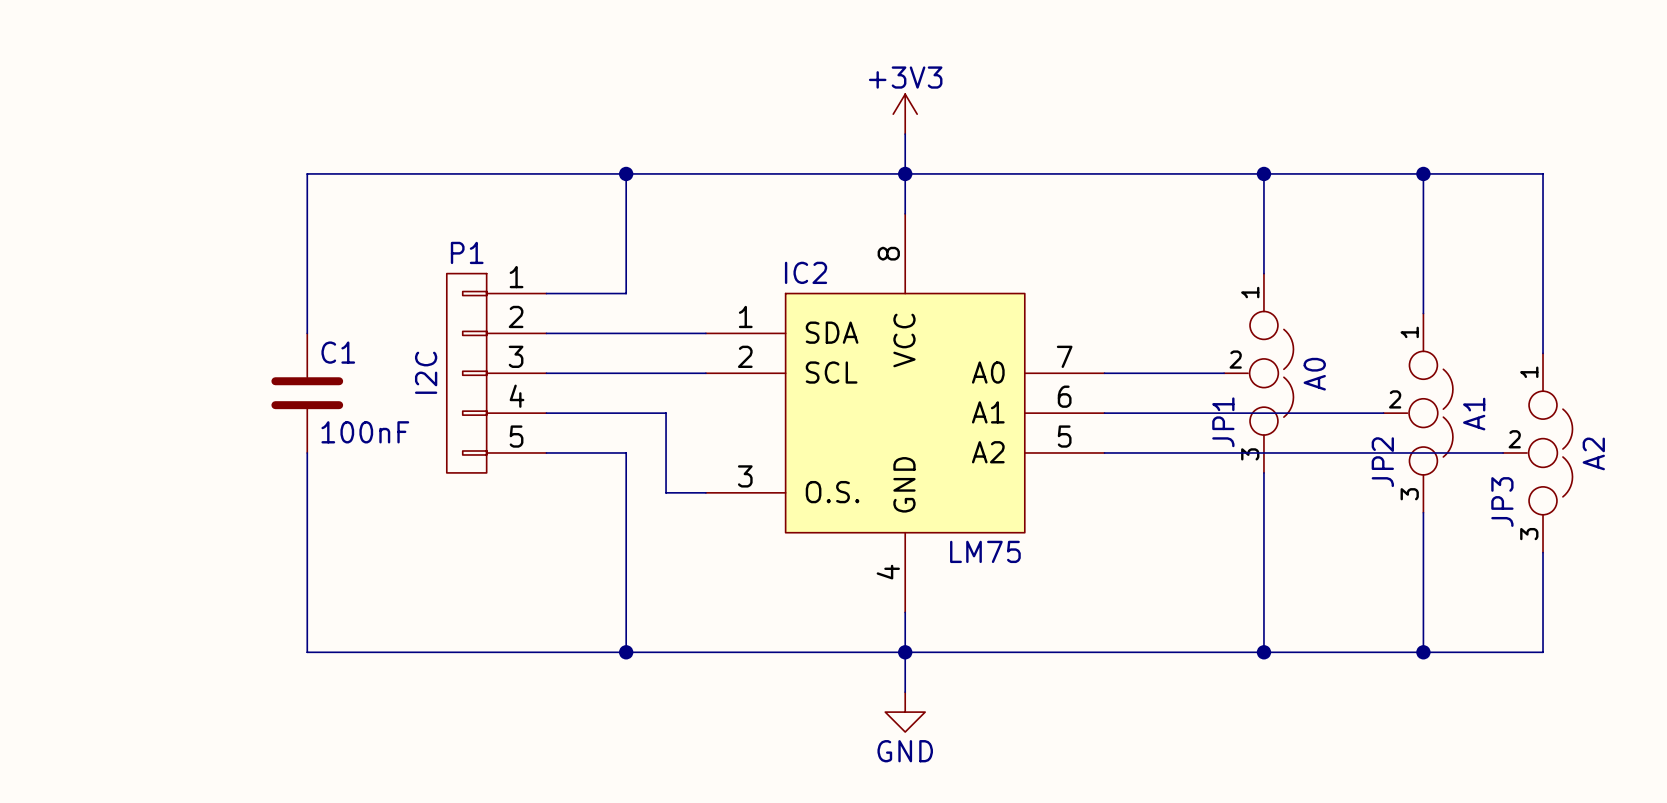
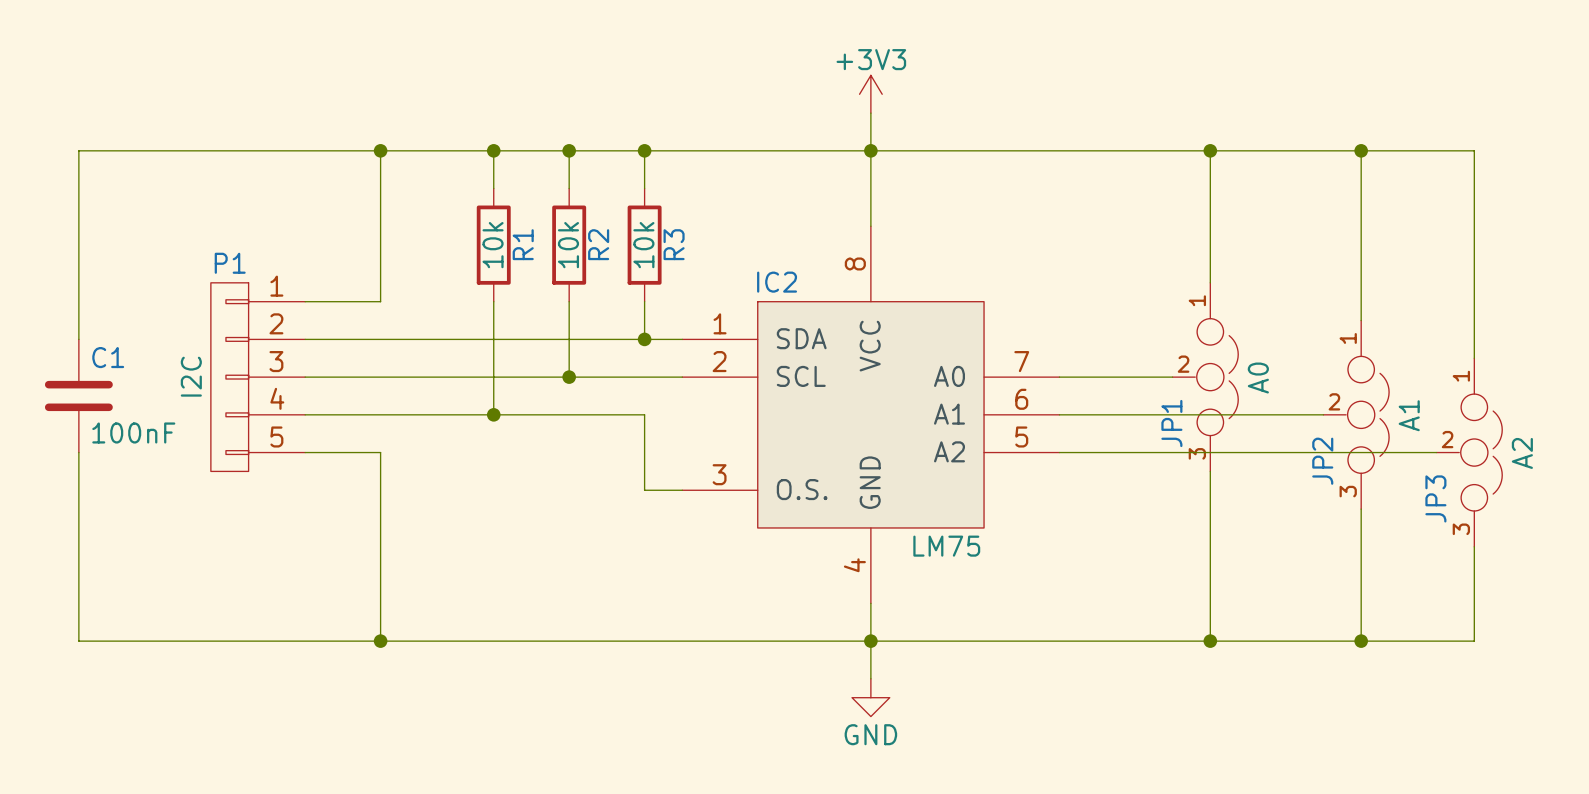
power symbol position: +3V3 (905, 114) -> +3V3 (870, 94)
wire: none -> (380, 150) (380, 301) (305, 301)
junction: none -> (380, 150)
wire: none -> (493, 150) (493, 188)
junction: none -> (493, 150)
wire: none -> (569, 150) (569, 188)
junction: none -> (569, 150)
wire: none -> (644, 150) (644, 188)
junction: none -> (644, 150)
wire: none -> (1210, 150) (1210, 188)
wire: none -> (1361, 150) (1361, 188)
wire: (626, 173) (626, 293) (546, 293) -> none
junction: (626, 173) -> none
junction position: (905, 173) -> (870, 150)
junction position: (1263, 173) -> (1210, 150)
junction position: (1423, 173) -> (1361, 150)
wire: (1543, 173) (307, 173) (307, 333) -> (1474, 188) (1474, 150) (78, 150) (78, 339)
R1: none -> 10k (493, 245)
R2: none -> 10k (569, 245)
R3: none -> 10k (644, 245)
wire: none -> (493, 301) (493, 414)
wire: none -> (569, 301) (569, 377)
wire: none -> (644, 301) (644, 339)
wire: none -> (305, 339) (531, 339)
junction: none -> (644, 339)
wire: none -> (305, 377) (531, 377)
P1 position: (496, 373) -> (258, 377)
junction: none -> (569, 377)
C1 position: (307, 393) -> (78, 395)
wire: none -> (305, 414) (531, 414)
junction: none -> (493, 414)
wire: none -> (78, 452) (78, 641) (305, 641)
wire: (307, 452) (307, 652) -> (305, 452) (380, 452) (380, 641)
wire: (546, 452) (626, 452) (626, 652) -> none
junction: none -> (380, 641)
junction: (626, 652) -> none

